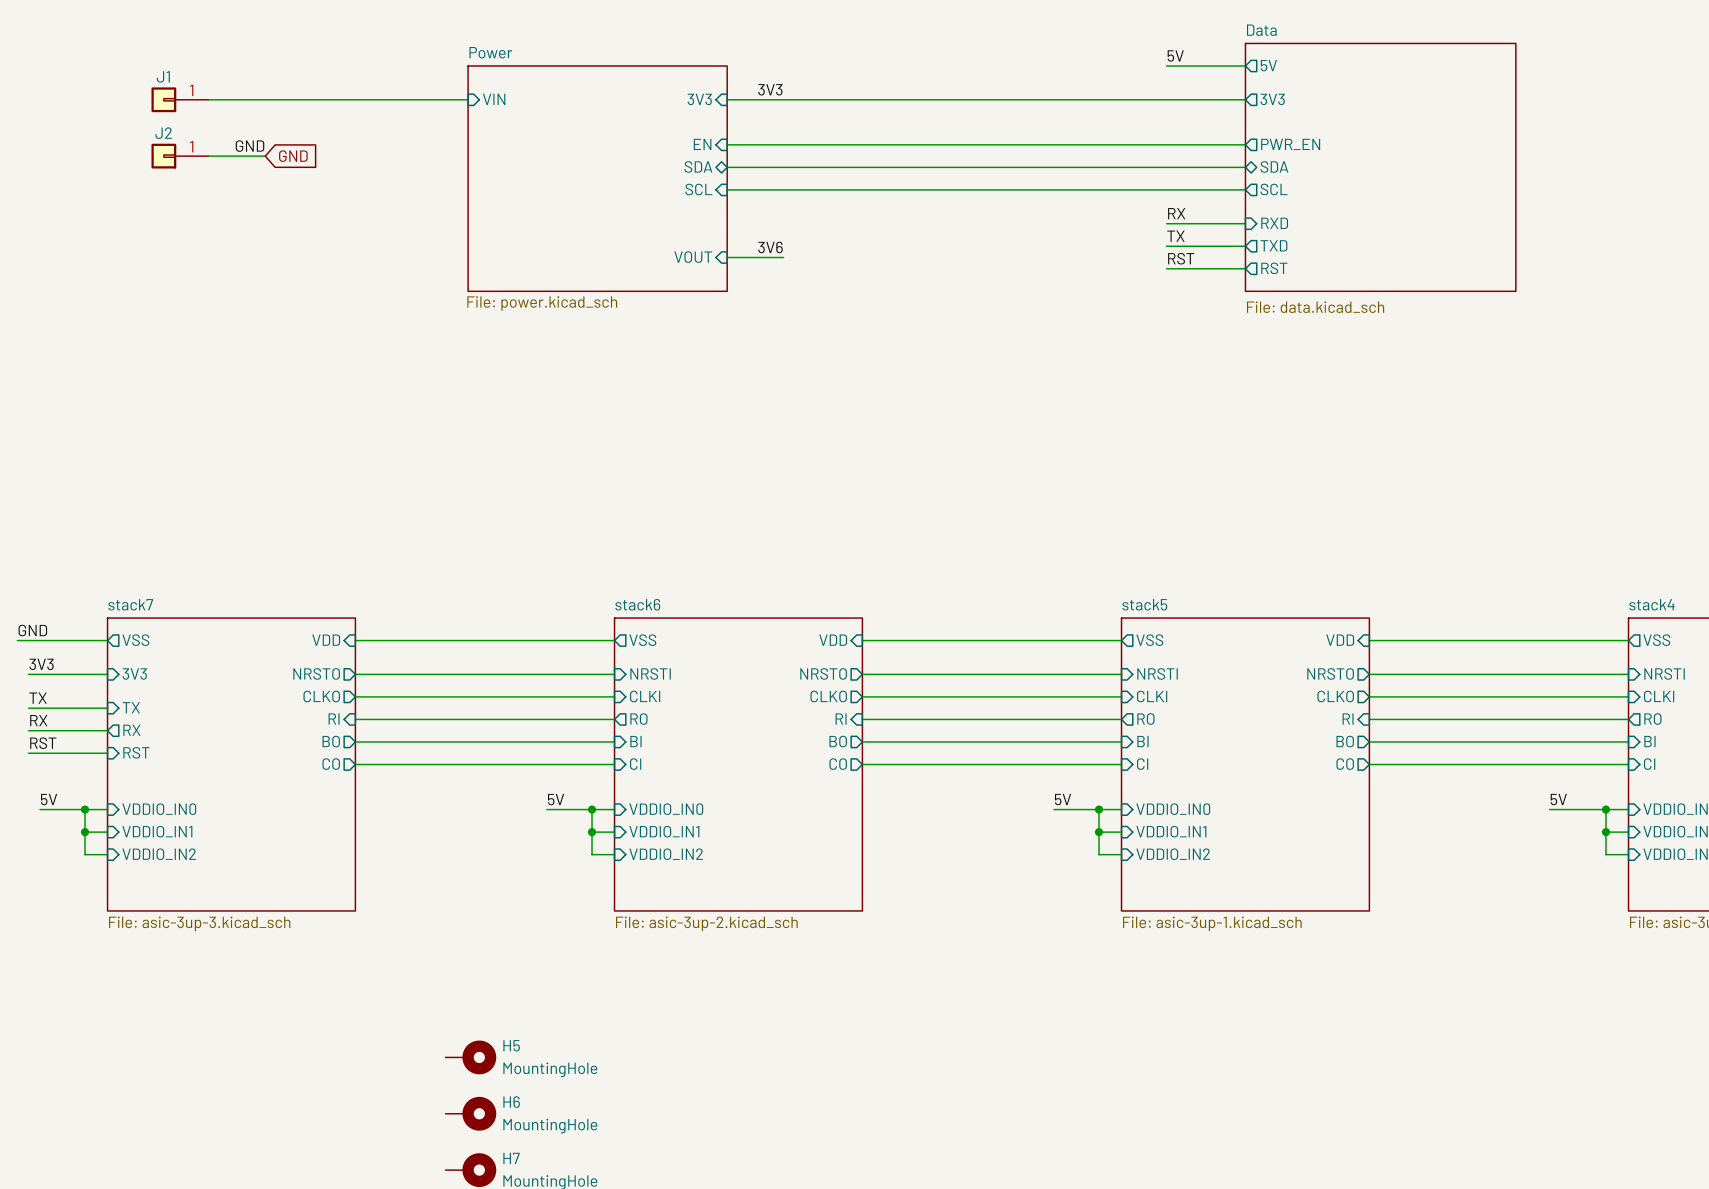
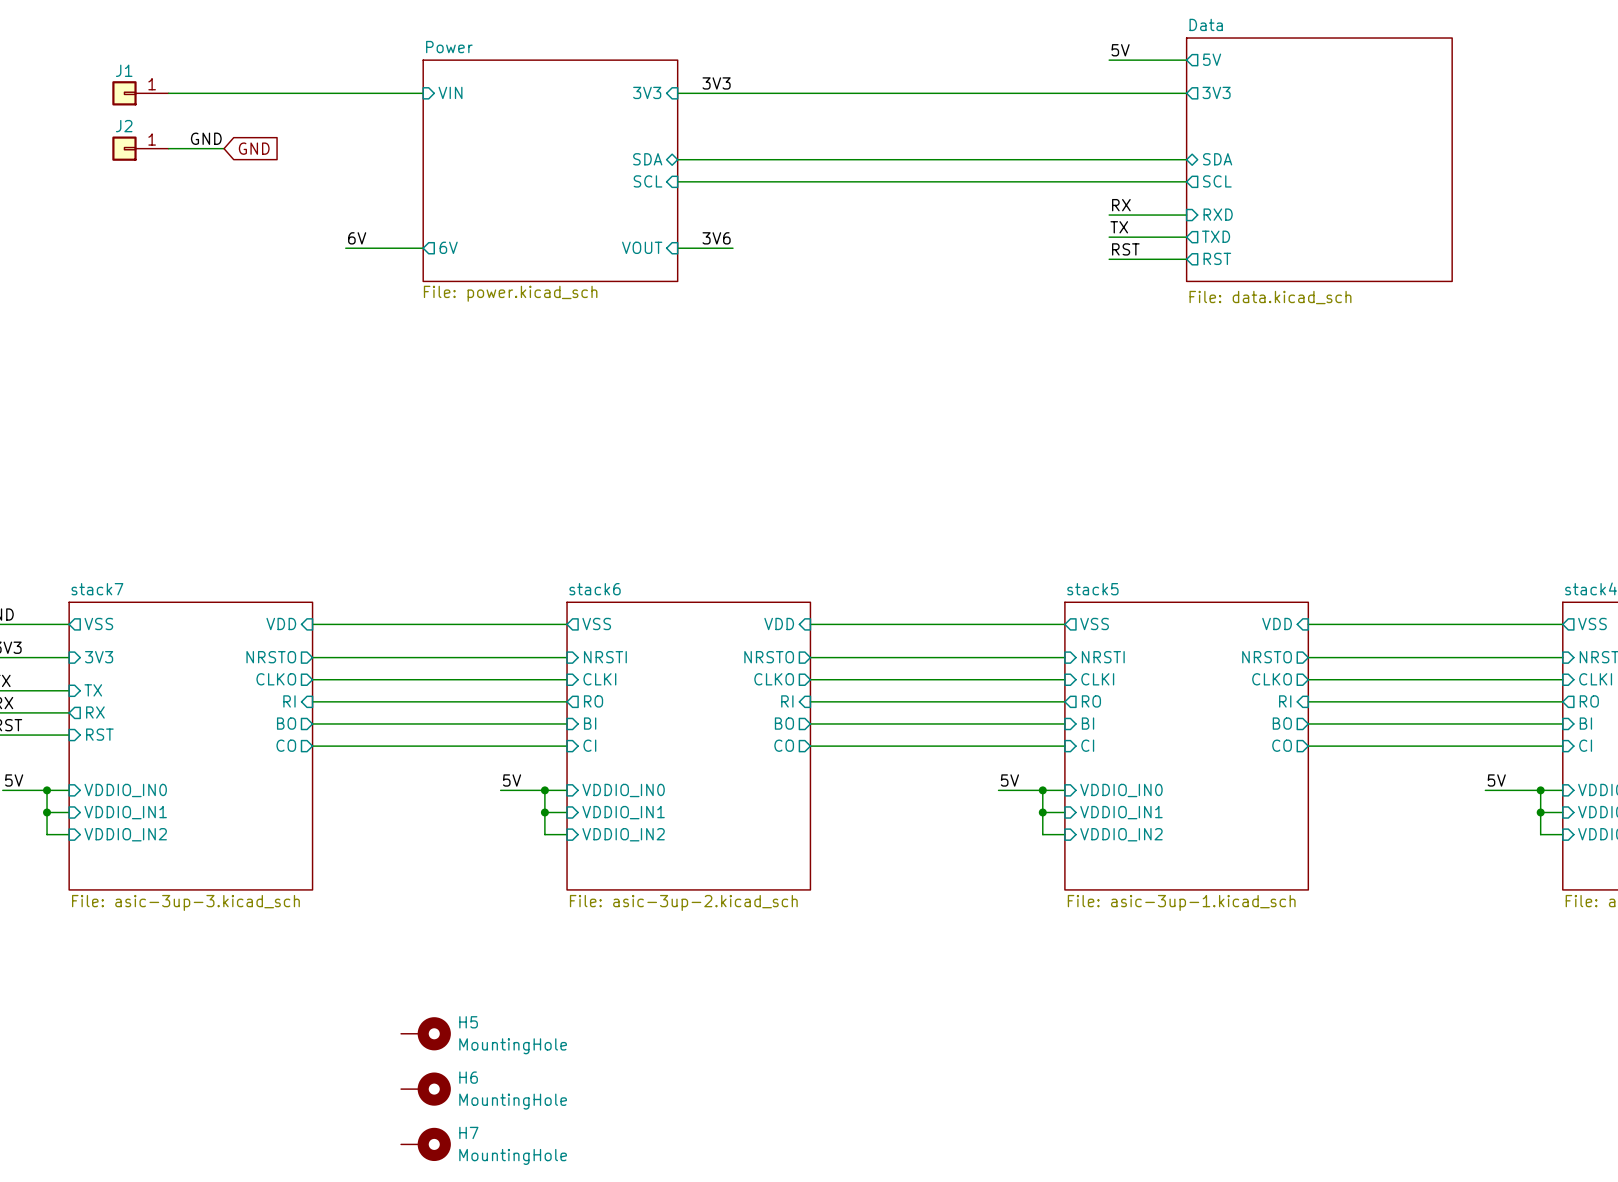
sheet pin: EN (702, 144) -> none
wire: (727, 144) (1245, 144) -> none
sheet pin: PWR_EN (1290, 144) -> none
label: none -> 6V (357, 238)
wire: none -> (345, 248) (423, 248)
sheet pin: none -> 6V (448, 247)

